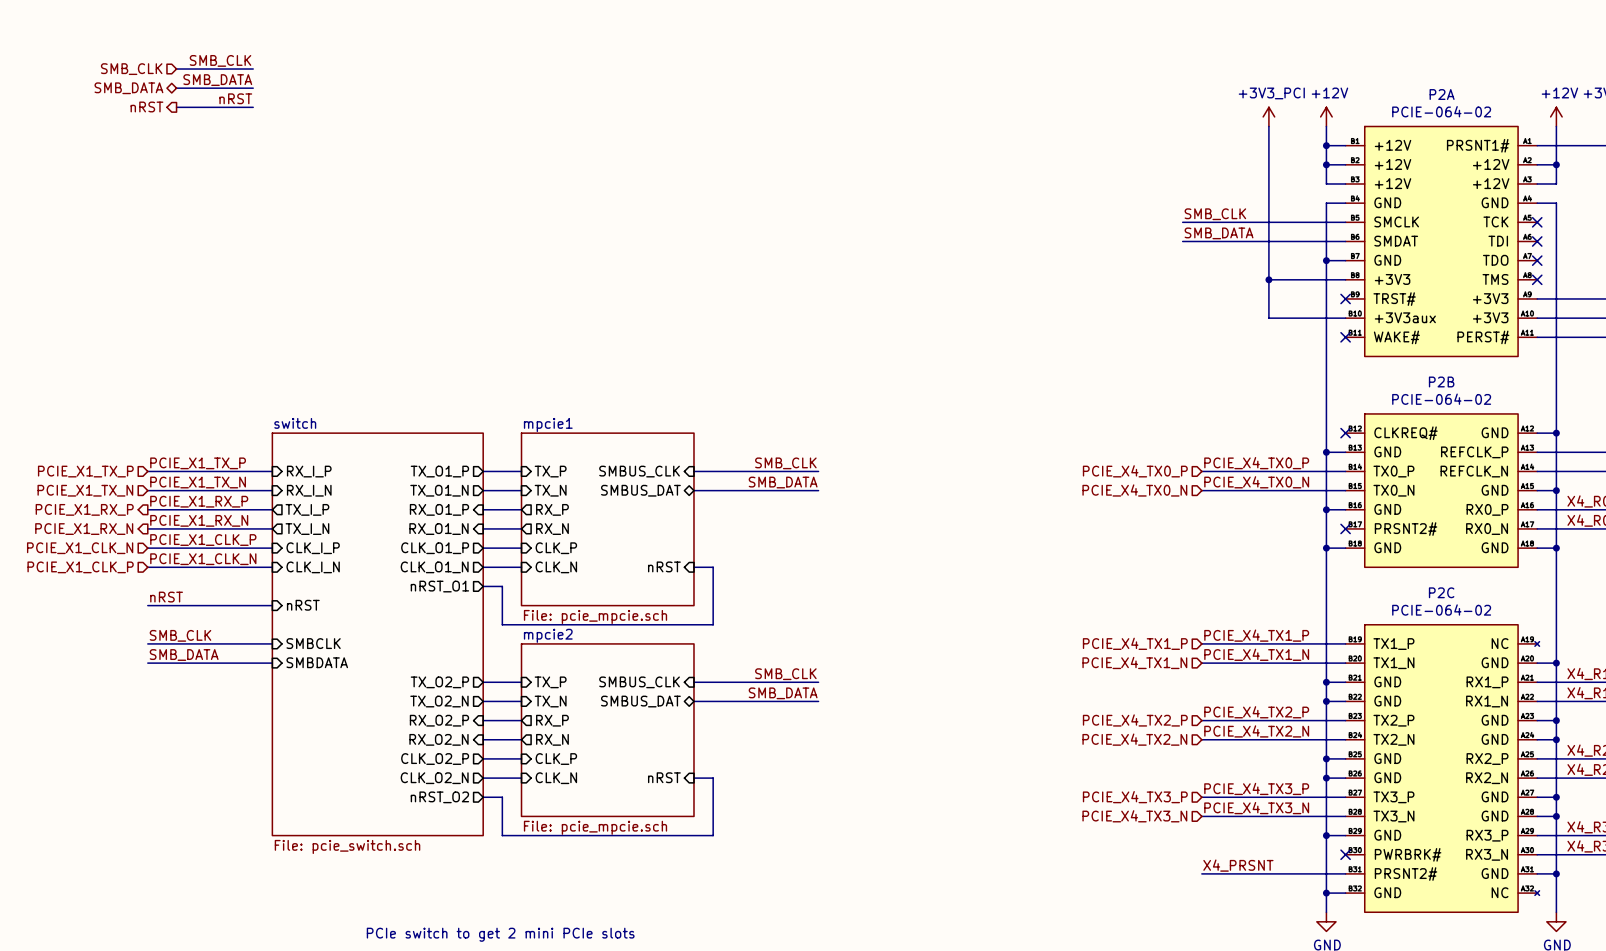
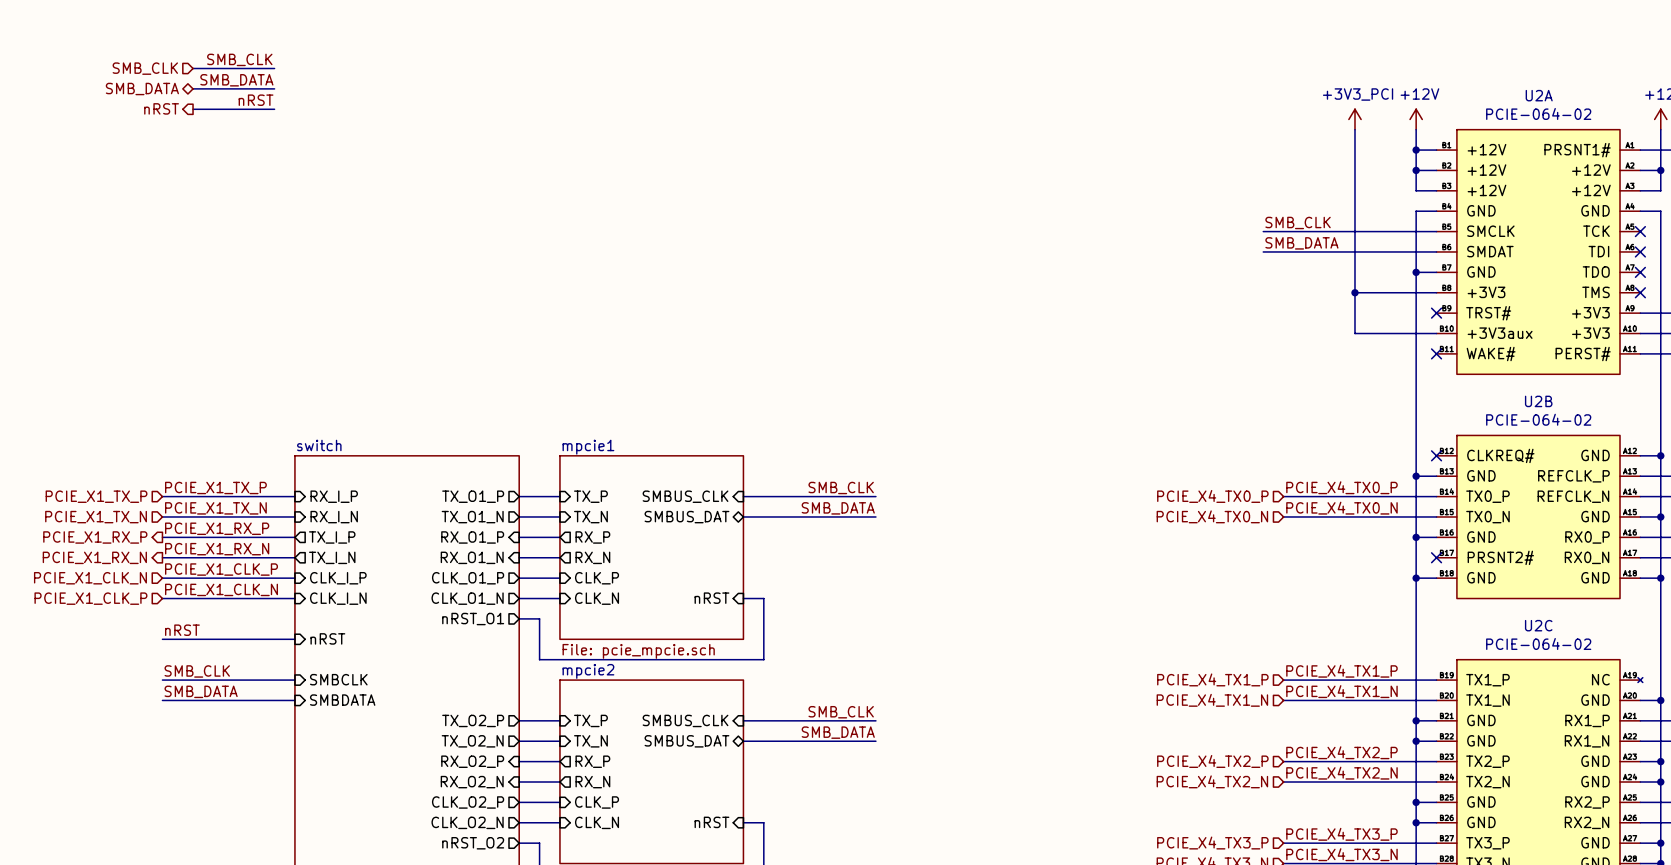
P2A name: P2A (1442, 94) -> U2A (1539, 95)
P2B name: P2B (1441, 381) -> U2B (1538, 401)
P2C name: P2C (1441, 592) -> U2C (1538, 625)

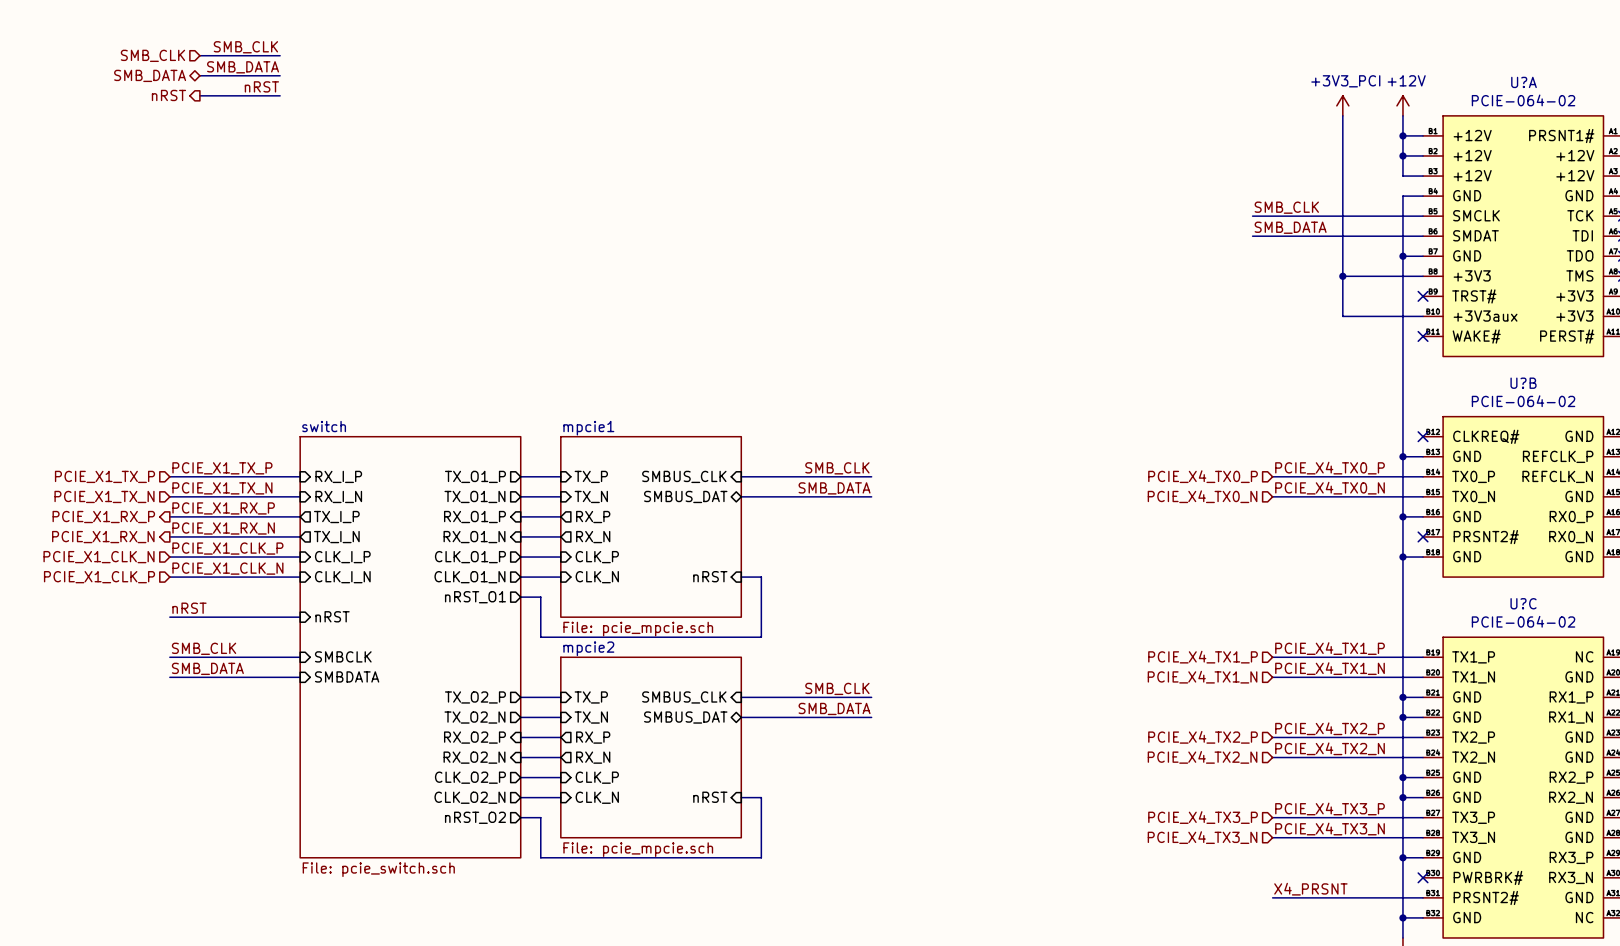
U2A name: U2A (1539, 95) -> U?A (1524, 82)
U2B name: U2B (1538, 401) -> U?B (1523, 383)
U2C name: U2C (1538, 625) -> U?C (1523, 603)

